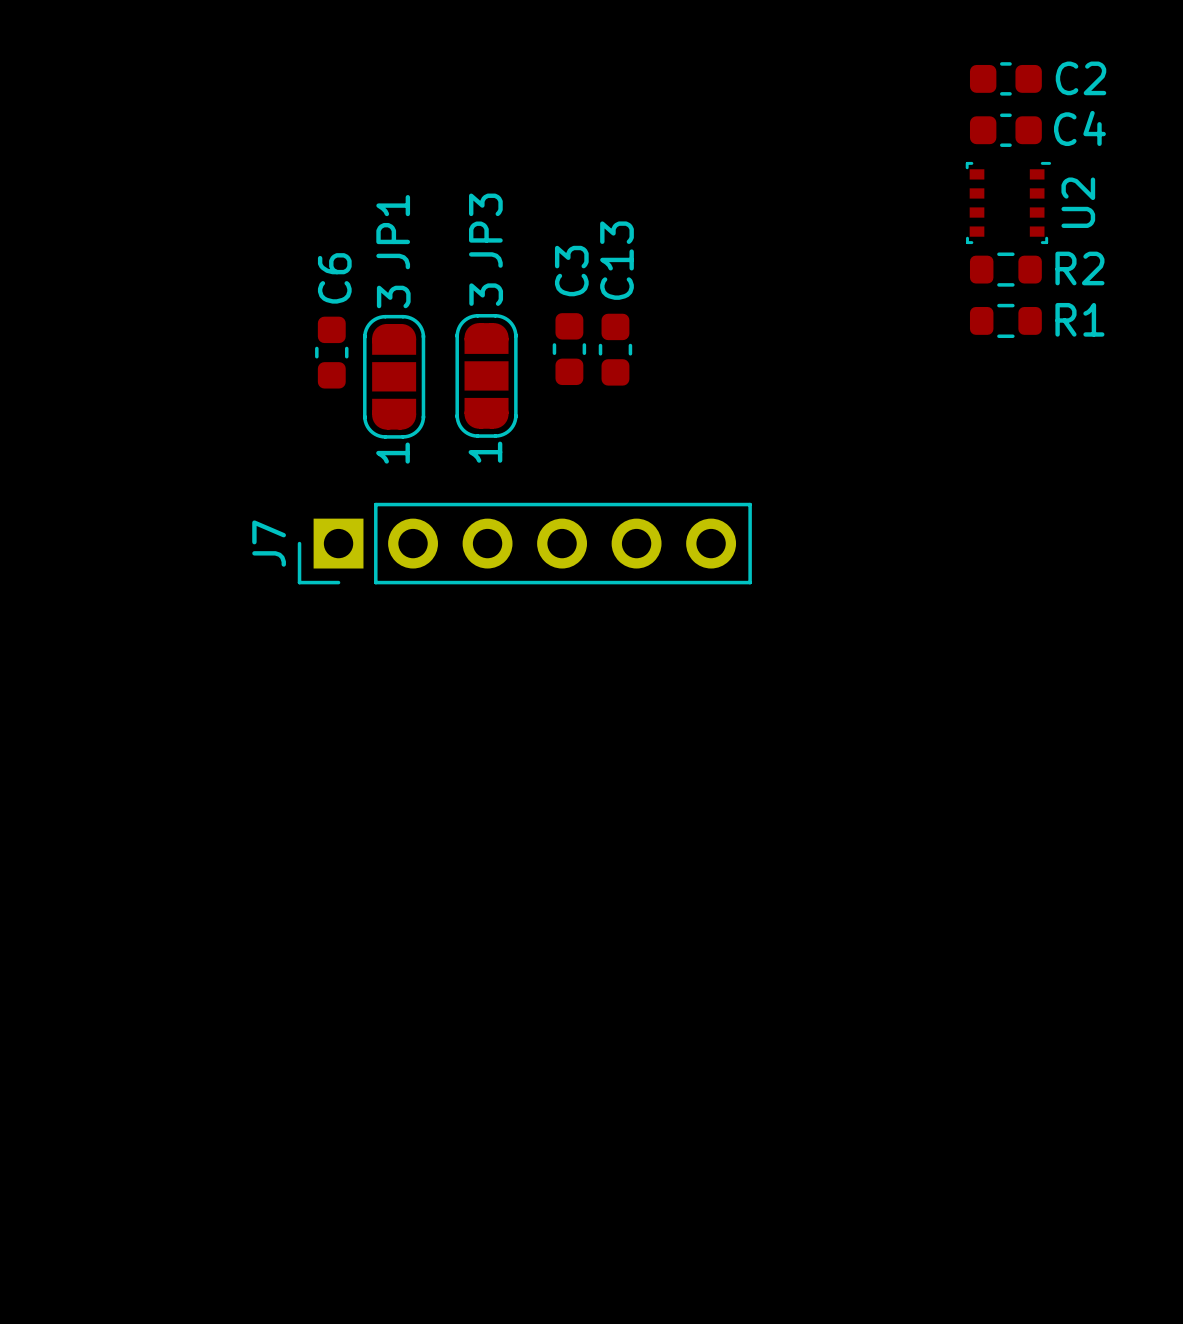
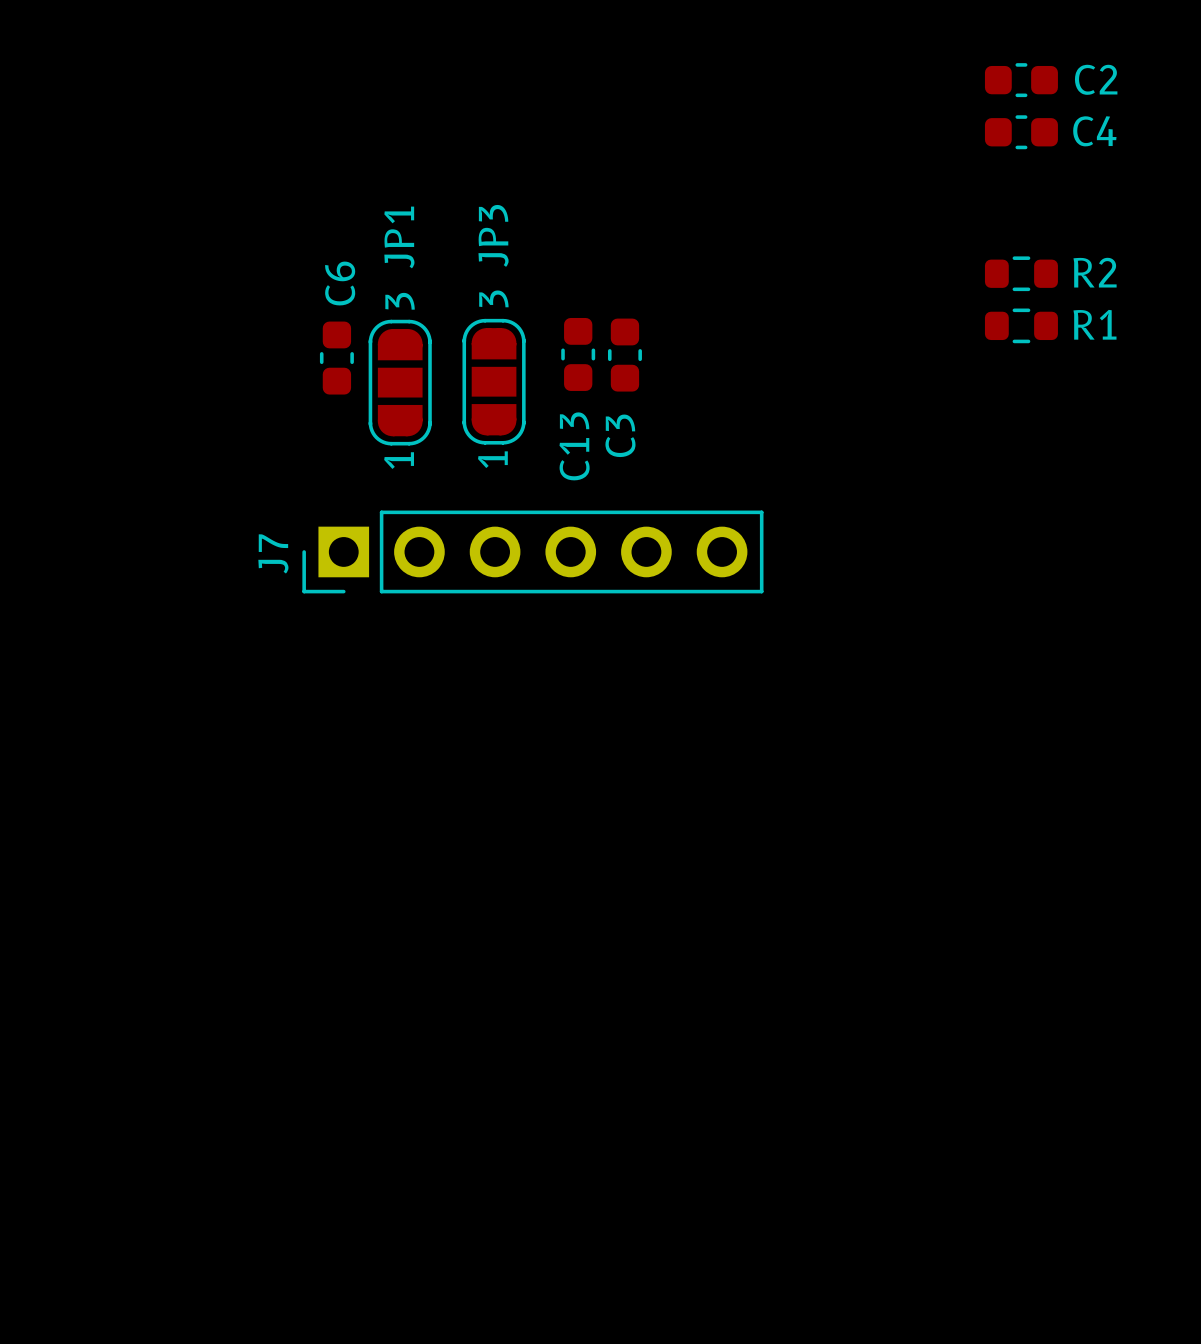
U2: (1008, 202) -> none
C13 name: C13 (617, 260) -> C3 (620, 435)
C3 name: C3 (571, 271) -> C13 (574, 446)

